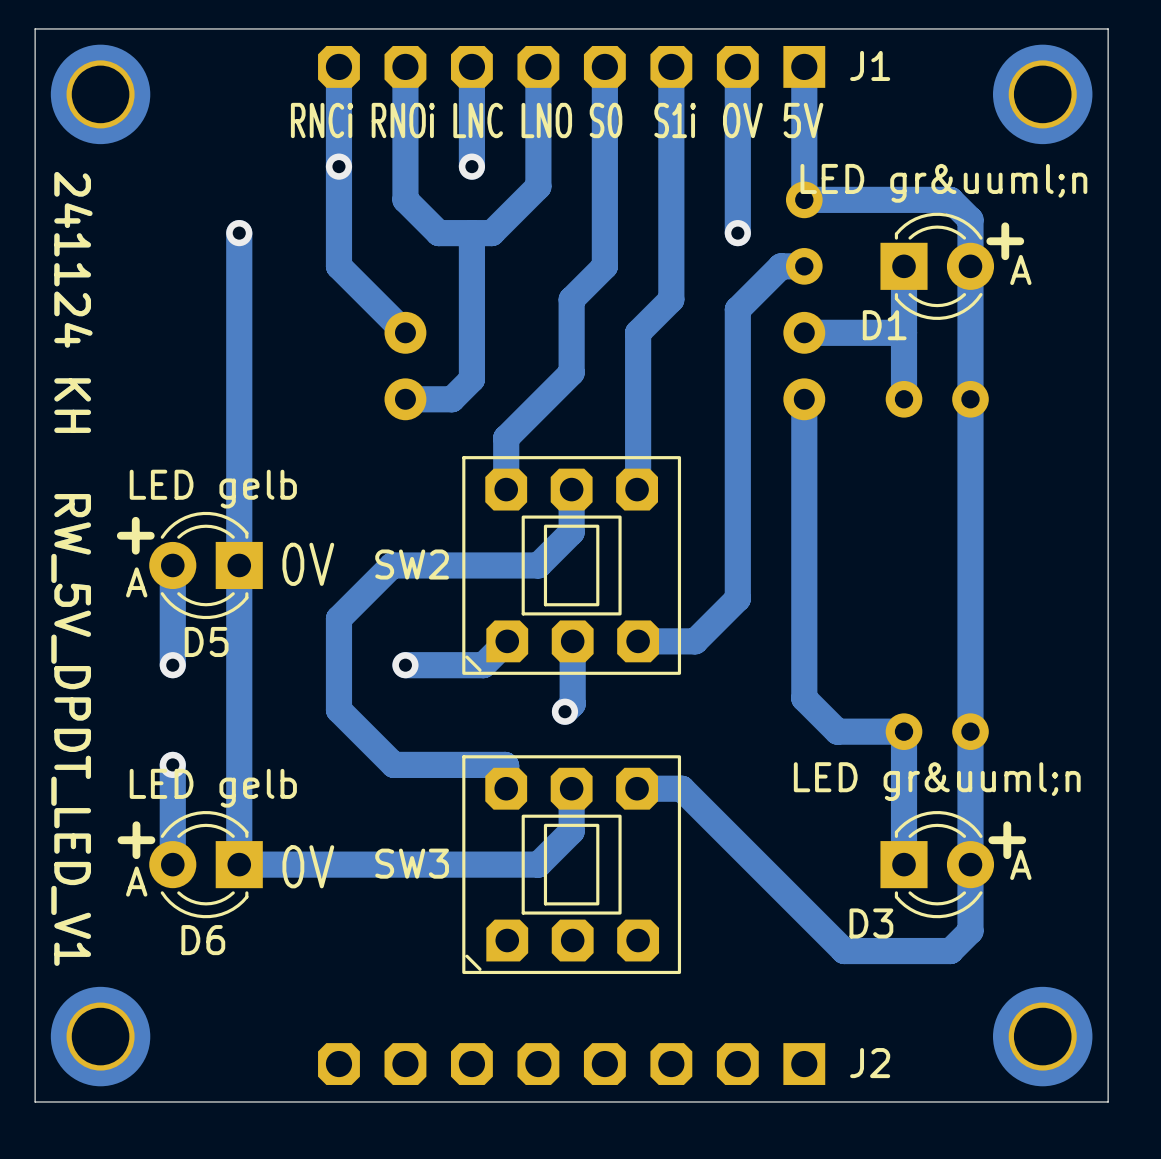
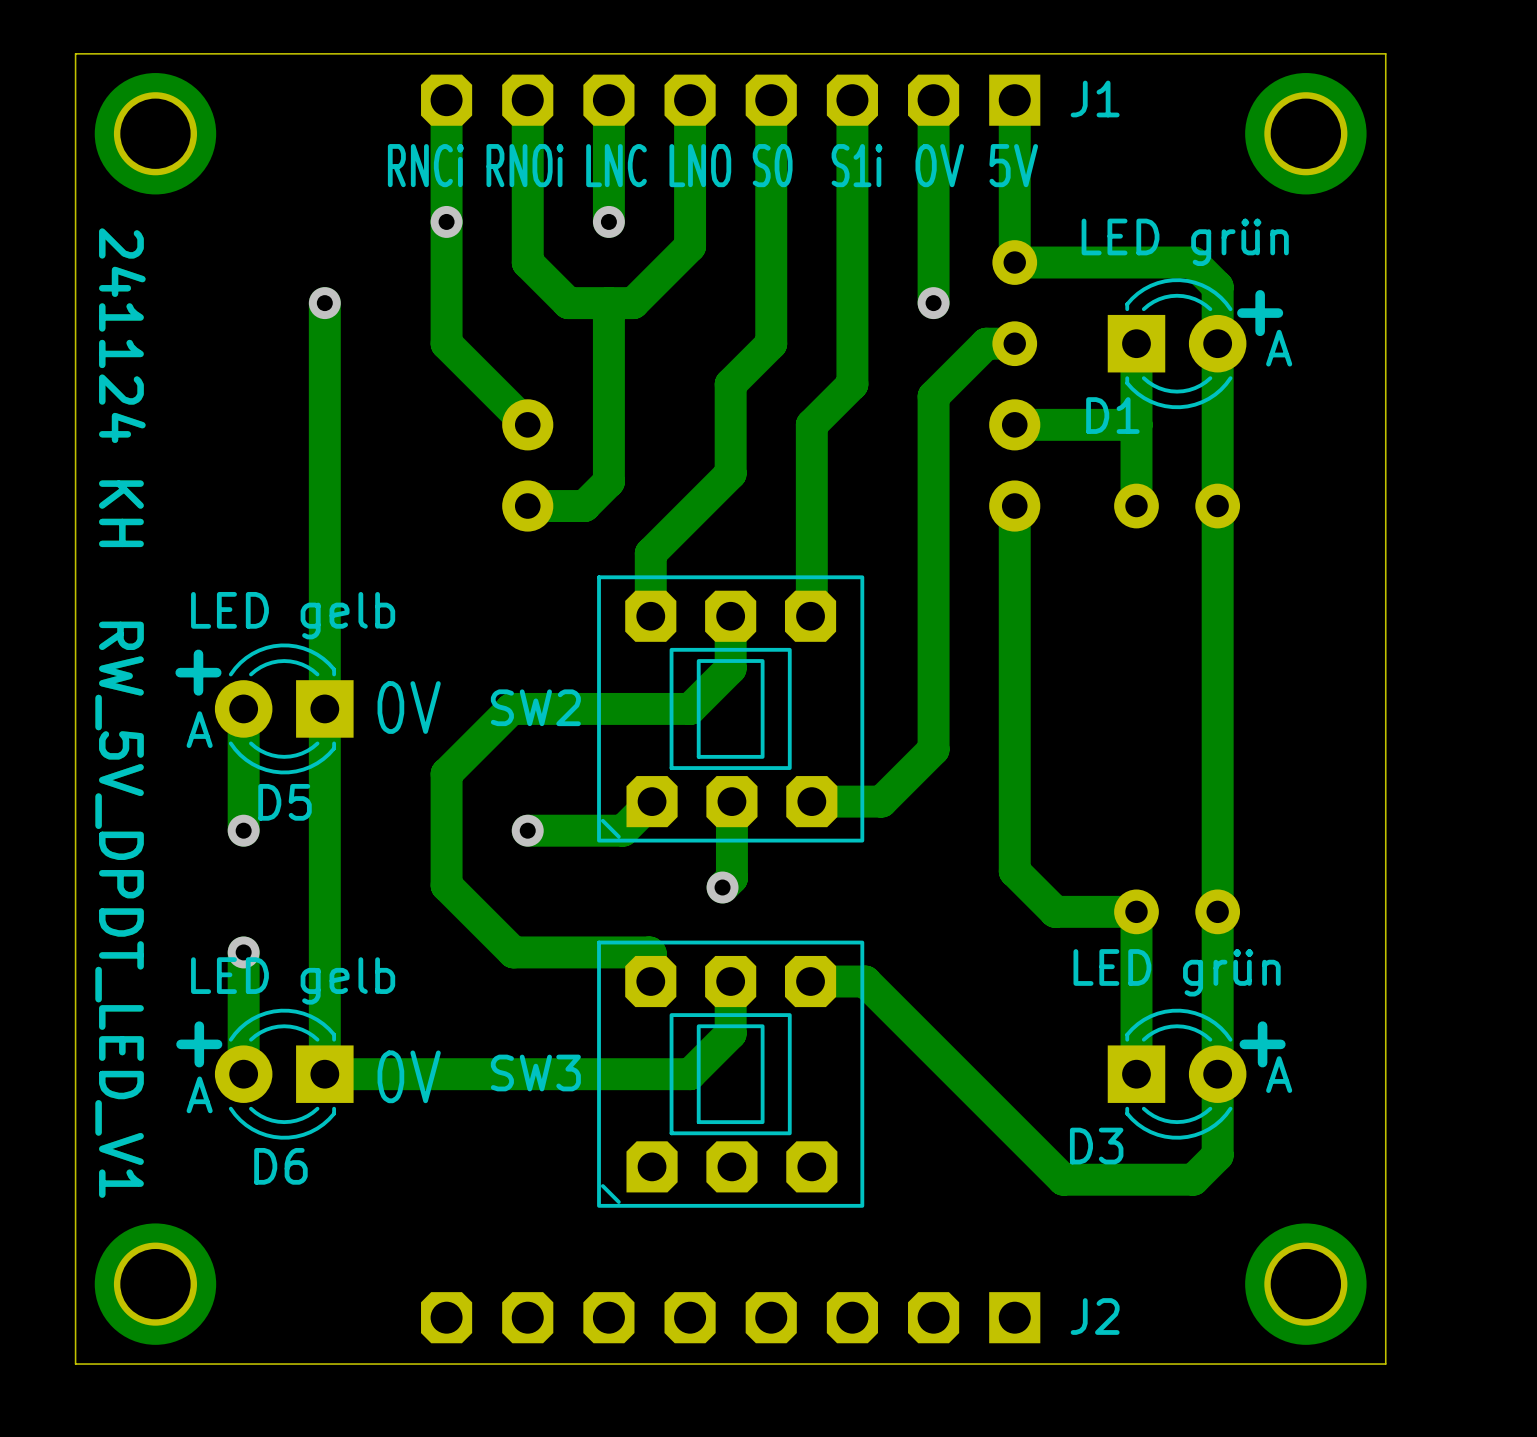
text: LED gr&uuml;n (943, 183) -> LED grün (1185, 242)
text: LED gr&uuml;n (937, 781) -> LED grün (1177, 972)

